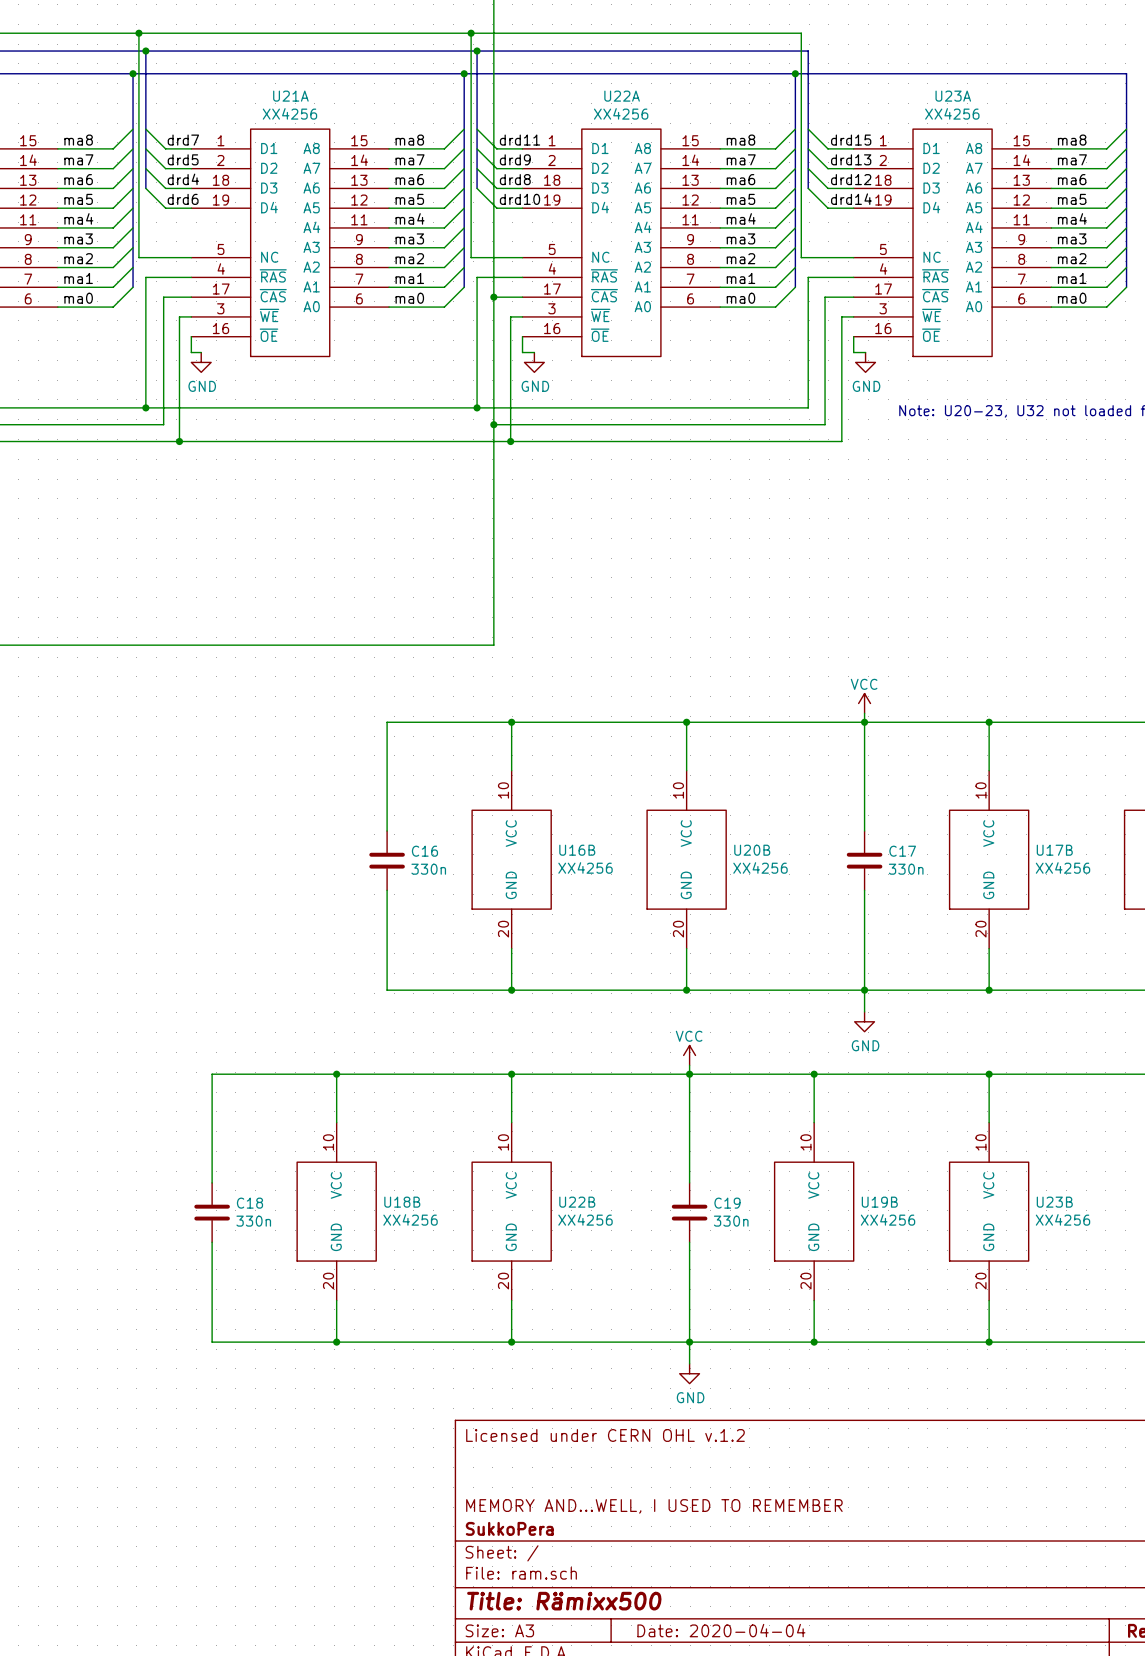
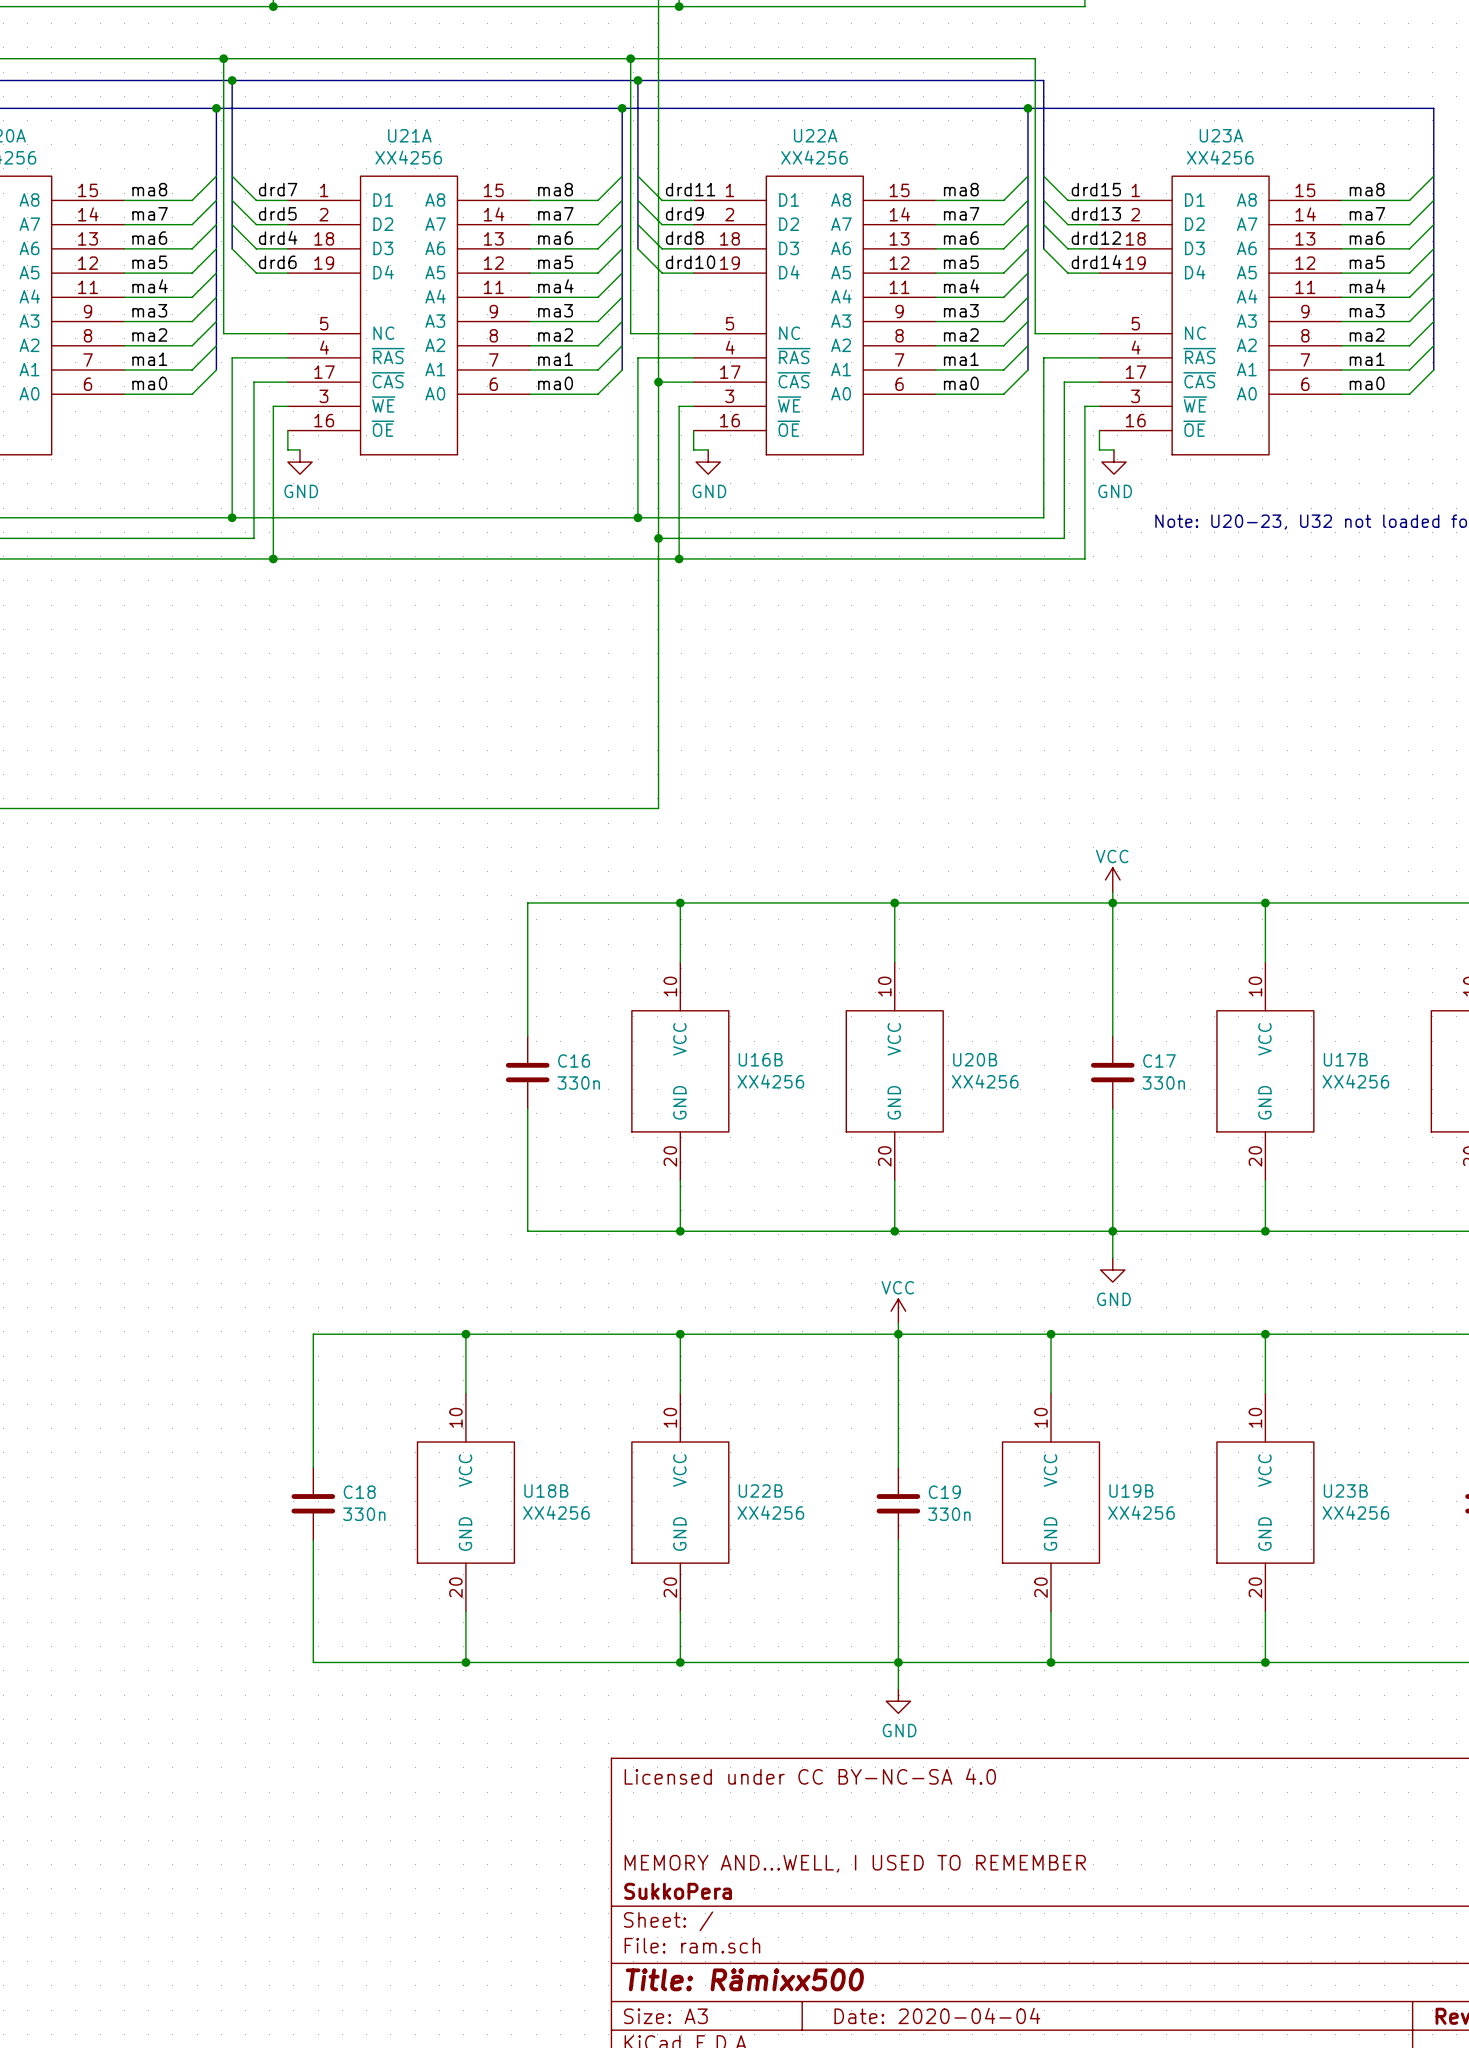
title block: Licensed under CERN OHL v.1.2 (605, 1435) -> Licensed under CC BY-NC-SA 4.0 (810, 1776)

